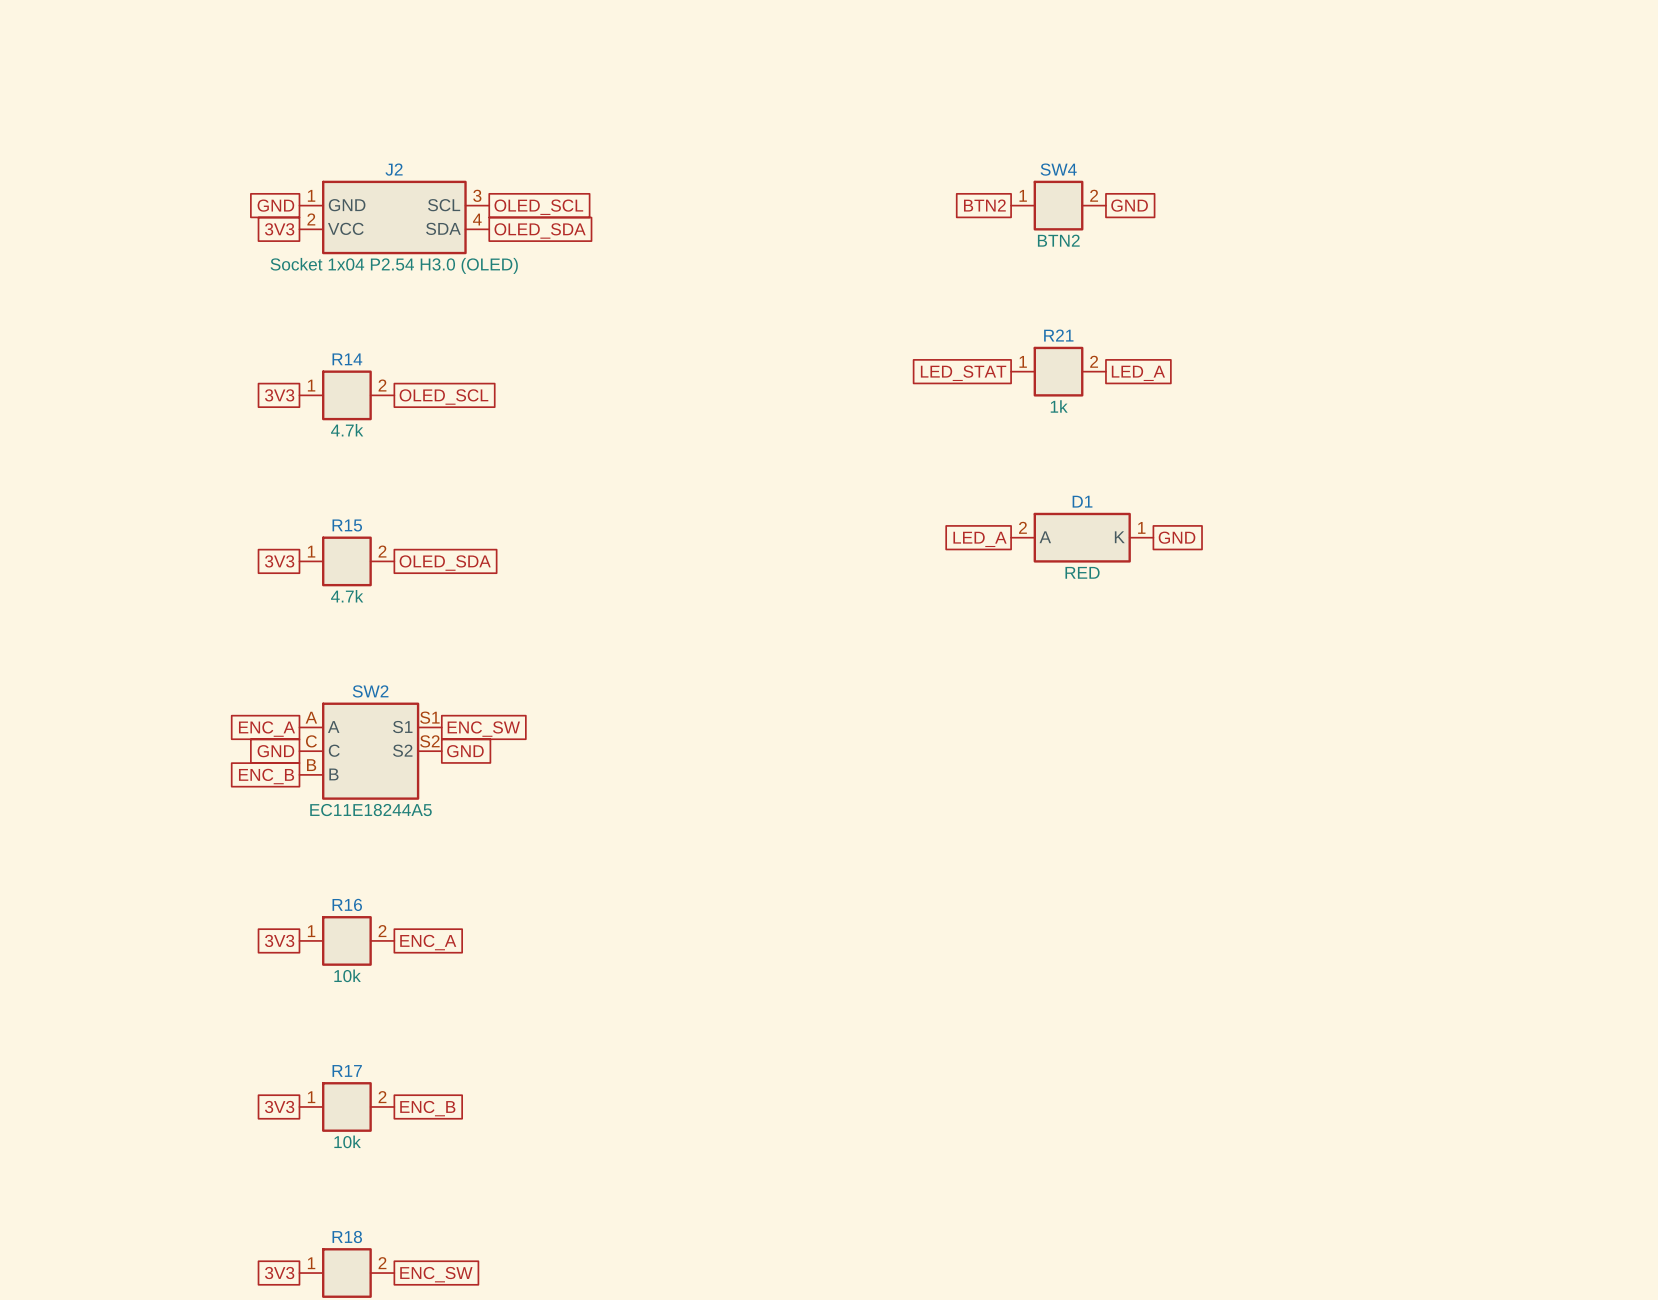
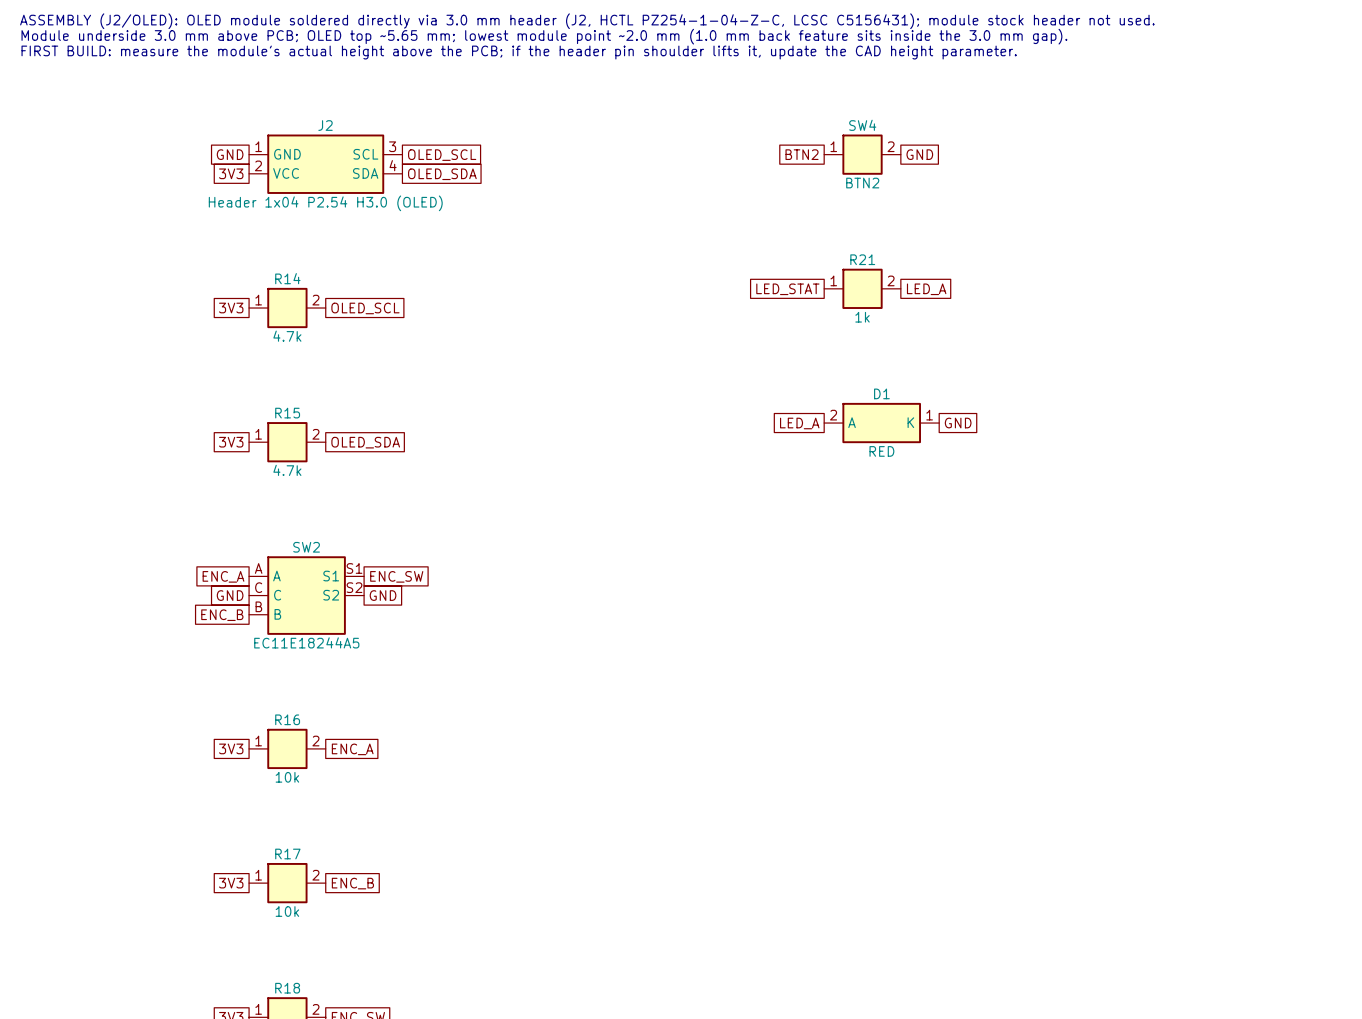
text: none -> ASSEMBLY (J2/OLED): OLED module soldered directly via 3.0 mm header (J2, HCTL PZ254-1-04-Z-C, LCSC C5156431); module stock header not used. (587, 21)
text: none -> Module underside 3.0 mm above PCB; OLED top ~5.65 mm; lowest module point ~2.0 mm (1.0 mm back feature sits inside the 3.0 mm gap). (544, 36)
text: none -> FIRST BUILD: measure the module's actual height above the PCB; if the header pin shoulder lifts it, update the CAD height parameter. (519, 52)
J2 value: Socket 1x04 P2.54 H3.0 (OLED) (394, 265) -> Header 1x04 P2.54 H3.0 (OLED) (325, 203)

